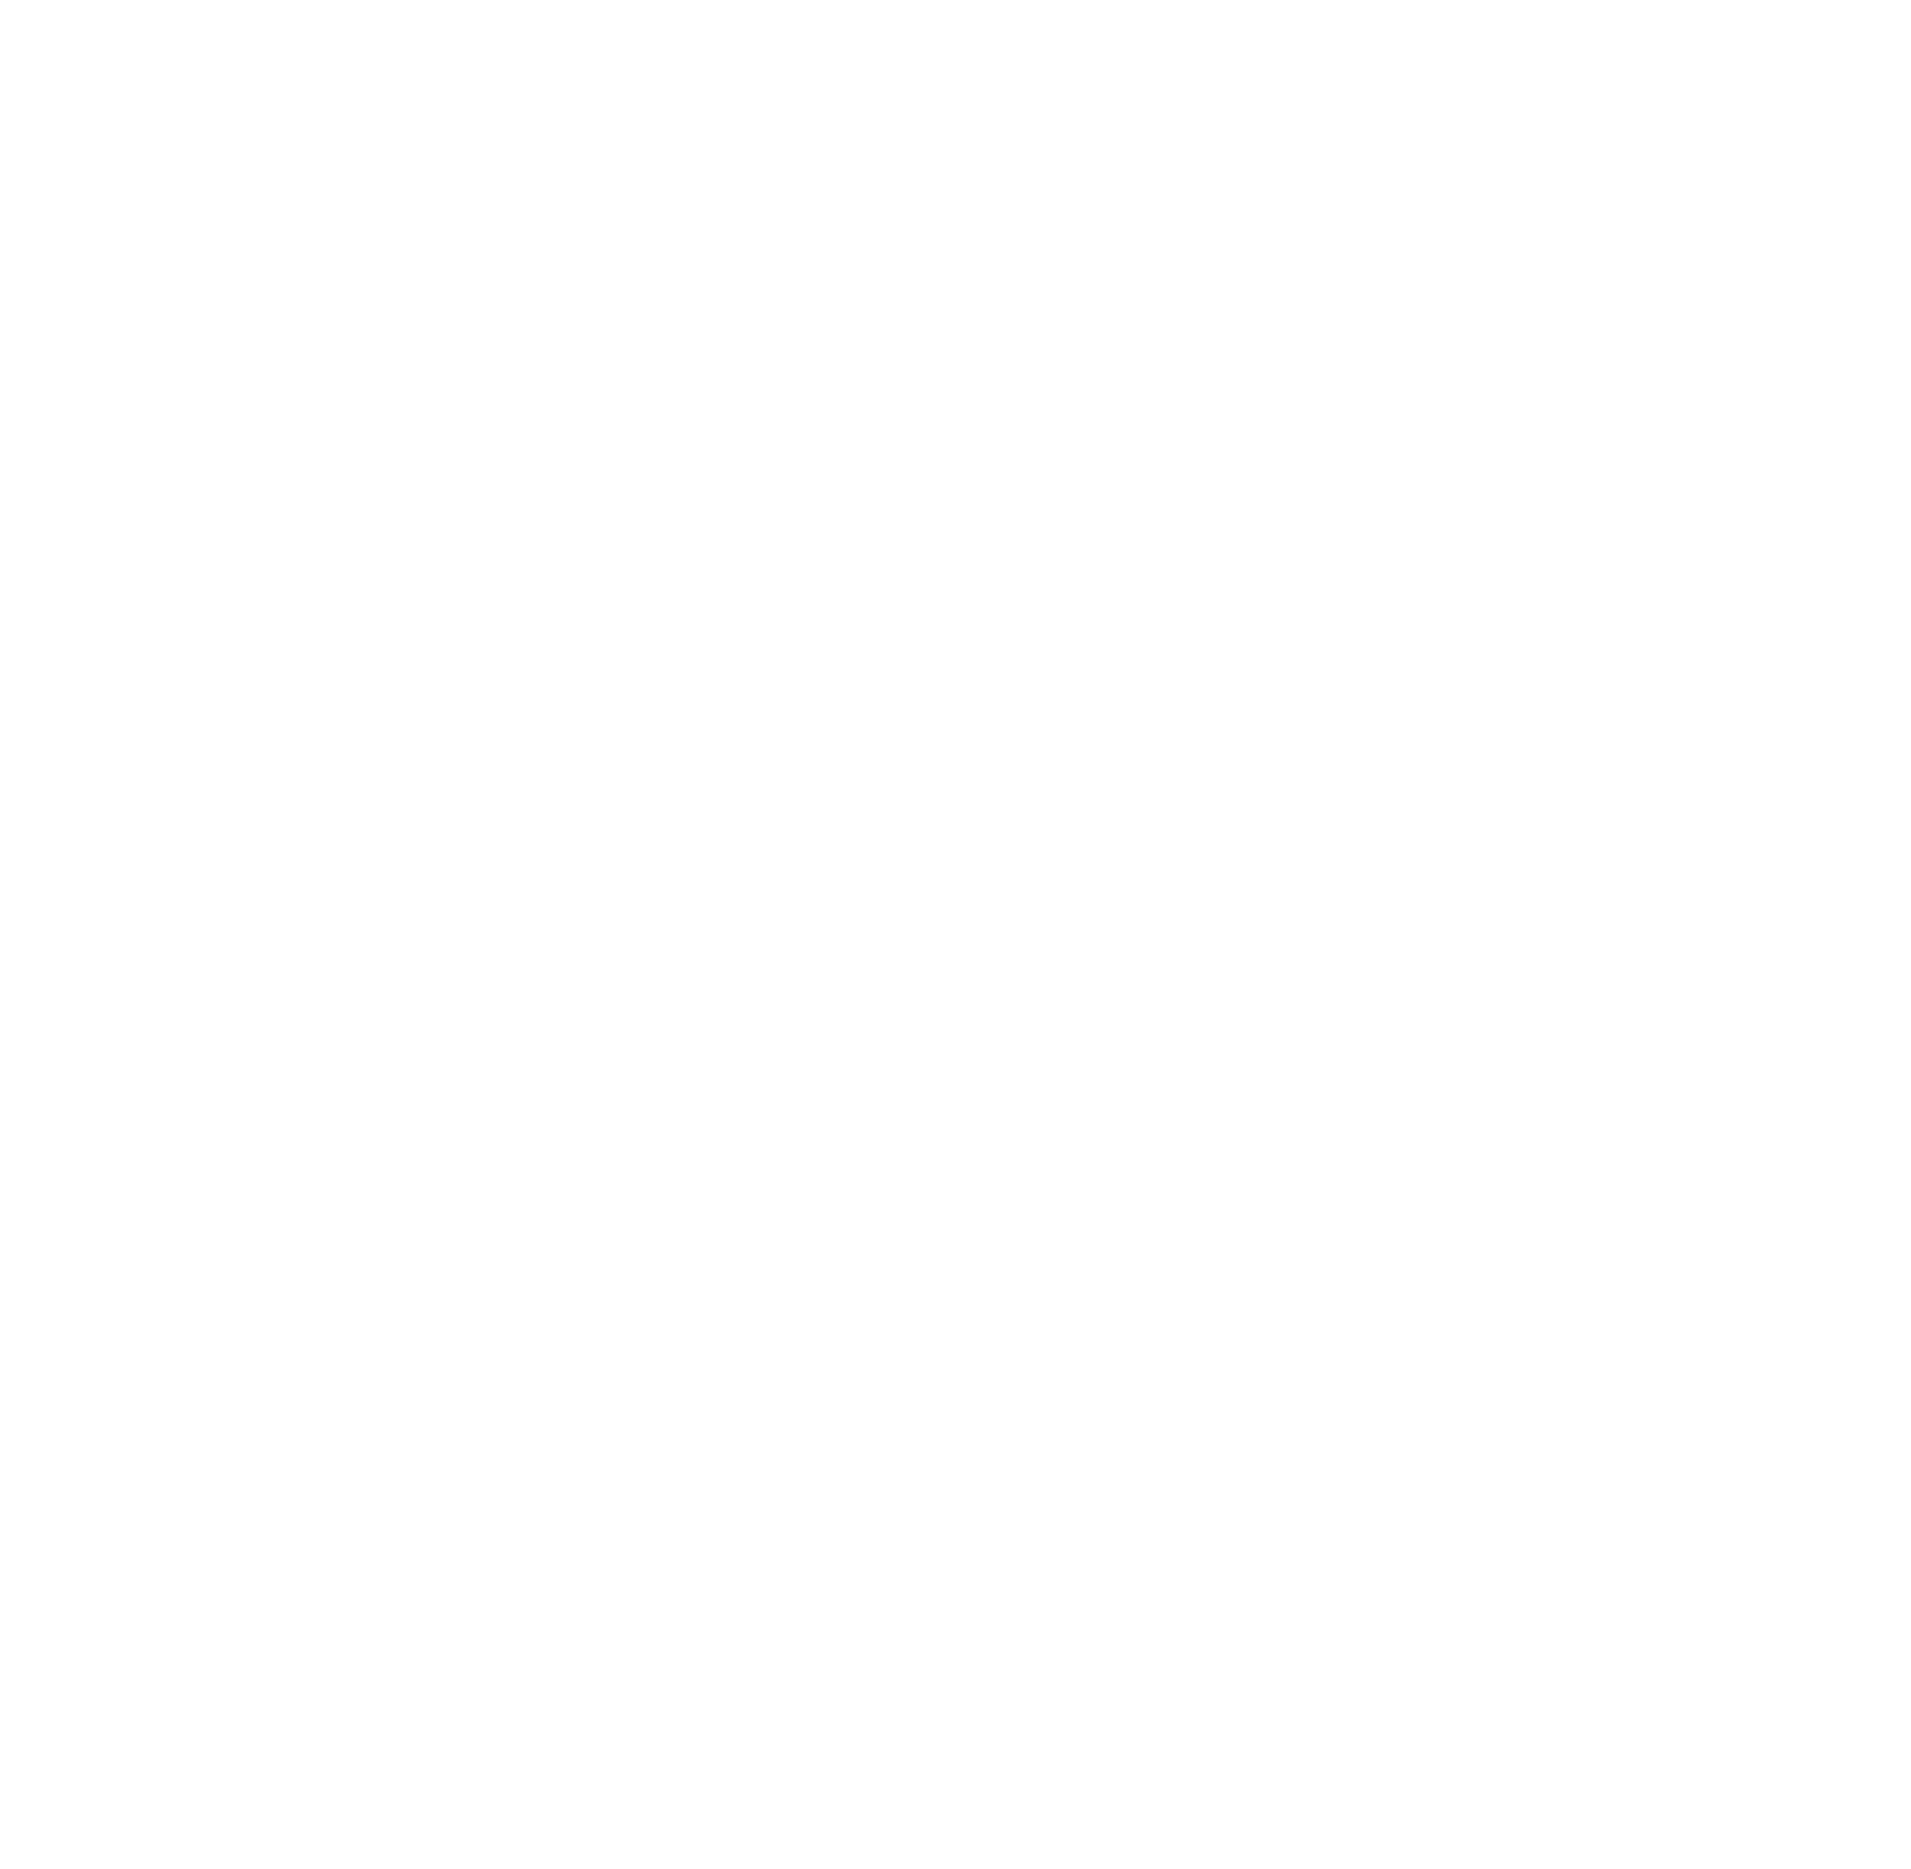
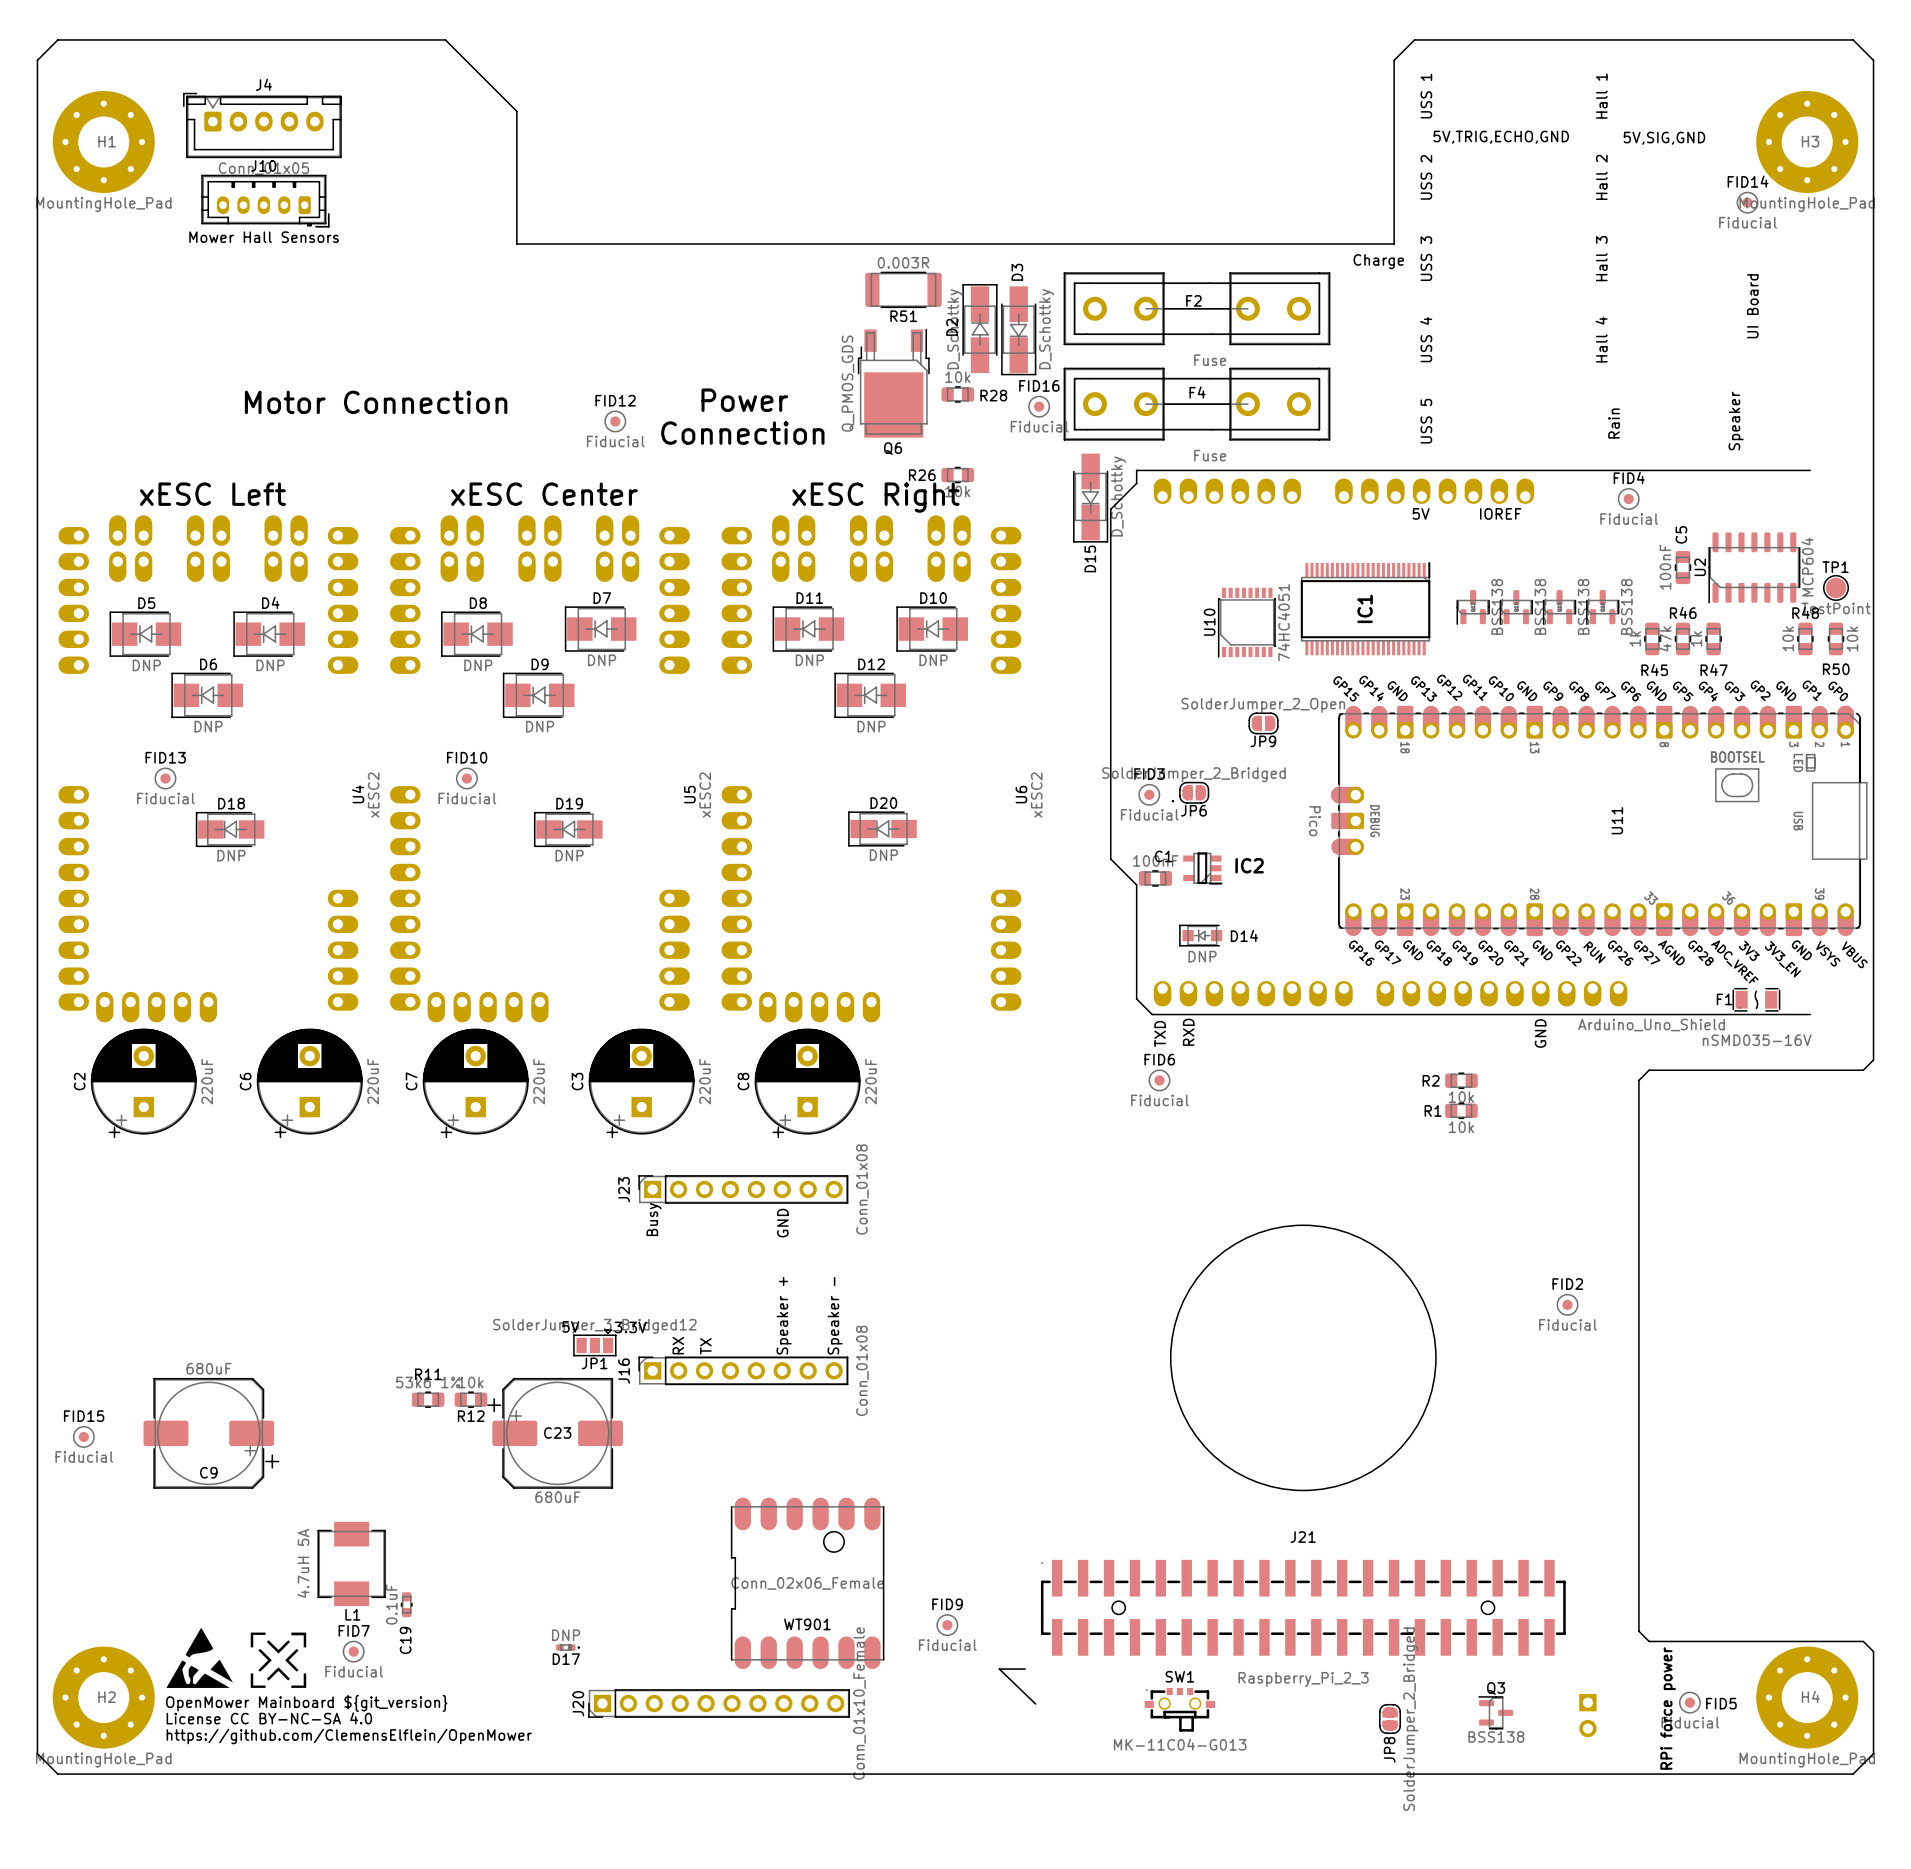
board edge: none -> (57, 39) (37, 60) (37, 1753) (57, 1774) (1853, 1774) (1873, 1753) (1873, 1651) (1863, 1641) (1649, 1641) (1638, 1631) (1638, 1080) (1649, 1070) (1863, 1070) (1873, 1060) (1873, 60) (1853, 39) (1414, 39) (1394, 60) (1394, 243) (516, 243) (516, 111) (445, 39) (57, 39)
text: none -> USS 1 (1426, 96)
text: none -> Hall 1 (1601, 96)
J4: none -> Conn_01x05 (262, 125)
text: none -> 5V,TRIG,ECHO,GND (1501, 137)
text: none -> 5V,SIG,GND (1664, 138)
H1: none -> MountingHole_Pad (103, 141)
H3: none -> MountingHole_Pad (1807, 141)
text: none -> USS 2 (1426, 177)
text: none -> Hall 2 (1601, 177)
J10: none -> (265, 201)
FID14: none -> Fiducial (1747, 202)
text: none -> Mower Hall Sensors (264, 237)
text: none -> USS 3 (1426, 258)
text: none -> Hall 3 (1601, 258)
text: none -> Charge (1378, 261)
R51: none -> 0.003R (903, 289)
text: none -> UI Board (1752, 306)
F2: none -> Fuse (1196, 308)
D2: none -> D_Schottky (979, 328)
D3: none -> D_Schottky (1018, 330)
text: none -> USS 4 (1426, 339)
text: none -> Hall 4 (1601, 339)
Q6: none -> Q_PMOS_GDS (893, 383)
R28: none -> 10k (957, 394)
text: none -> Power (744, 400)
text: none -> Motor Connection (376, 402)
F4: none -> Fuse (1196, 404)
FID16: none -> Fiducial (1039, 406)
text: none -> Speaker (1736, 420)
FID12: none -> Fiducial (615, 421)
text: none -> USS 5 (1426, 421)
text: none -> Rain (1614, 423)
text: none -> Connection (742, 433)
R26: none -> 10k (957, 475)
text: none -> xESC Left (212, 494)
text: none -> xESC Center (544, 494)
text: none -> xESC Right (875, 497)
D15: none -> D_Schottky (1090, 498)
FID4: none -> Fiducial (1628, 499)
text: none -> 5V (1421, 513)
text: none -> IOREF (1500, 513)
C5: none -> 100nF (1682, 567)
U2: none -> MCP604 (1754, 567)
TP1: none -> TestPoint (1836, 587)
part: none -> BSS138 (1473, 607)
part: none -> BSS138 (1516, 607)
part: none -> BSS138 (1559, 607)
part: none -> BSS138 (1602, 607)
IC1: none -> (1365, 608)
U10: none -> 74HC4051 (1246, 622)
D7: none -> DNP (600, 629)
D11: none -> DNP (808, 629)
D10: none -> DNP (932, 629)
D5: none -> DNP (145, 634)
D4: none -> DNP (269, 634)
D8: none -> DNP (476, 634)
R45: none -> 1k (1652, 638)
R46: none -> 47k (1682, 638)
R47: none -> 1k (1713, 638)
R48: none -> 10k (1805, 638)
R50: none -> 10k (1836, 638)
D6: none -> DNP (207, 695)
D9: none -> DNP (538, 695)
D12: none -> DNP (870, 695)
JP9: none -> SolderJumper_2_Open (1263, 723)
part: none -> Arduino_Uno_Shield (1460, 742)
U4: none -> xESC2 (208, 768)
U5: none -> xESC2 (539, 768)
U6: none -> xESC2 (871, 768)
FID13: none -> Fiducial (165, 778)
FID10: none -> Fiducial (466, 778)
JP6: none -> SolderJumper_2_Bridged (1194, 792)
FID3: none -> Fiducial (1149, 794)
U11: none -> Pico (1599, 820)
D20: none -> DNP (882, 828)
D18: none -> DNP (230, 829)
D19: none -> DNP (568, 829)
IC2: none -> (1202, 868)
C1: none -> 100nF (1155, 878)
D14: none -> DNP (1200, 935)
F1: none -> nSMD035-16V (1756, 999)
text: none -> RXD (1188, 1032)
text: none -> TXD (1160, 1033)
text: none -> GND (1540, 1033)
FID6: none -> Fiducial (1159, 1080)
R2: none -> 10k (1461, 1080)
C2: none -> 220uF (143, 1083)
C6: none -> 220uF (309, 1083)
C7: none -> 220uF (475, 1083)
C3: none -> 220uF (641, 1083)
C8: none -> 220uF (807, 1083)
R1: none -> 10k (1461, 1110)
J23: none -> Conn_01x08 (743, 1189)
text: none -> Busy (654, 1219)
text: none -> GND (782, 1223)
round board edge: none -> [1170, 1224, 1437, 1492]
FID2: none -> Fiducial (1567, 1304)
text: none -> Speaker + (784, 1315)
text: none -> Speaker - (835, 1315)
text: none -> 5V (570, 1326)
text: none -> 3.3V (630, 1327)
JP1: none -> SolderJumper_3_Bridged12 (594, 1342)
text: none -> RX (678, 1345)
text: none -> TX (705, 1346)
J16: none -> Conn_01x08 (743, 1370)
R11: none -> 53k6 1% (428, 1399)
R12: none -> 10k (470, 1399)
C9: none -> 680uF (211, 1433)
C23: none -> 680uF (555, 1433)
FID15: none -> Fiducial (83, 1436)
L1: none -> 4.7uH 5A (351, 1563)
WT901: none -> Conn_02x06_Female (807, 1583)
C19: none -> 0.1uF (406, 1604)
J21: none -> Raspberry_Pi_2_3 (1303, 1607)
FID9: none -> Fiducial (947, 1625)
drawing: none -> [166, 1627, 233, 1689]
drawing: none -> [250, 1632, 307, 1688]
D17: none -> DNP (567, 1647)
FID7: none -> Fiducial (353, 1651)
line: none -> (1025, 1669) (999, 1669) (1035, 1704)
H2: none -> MountingHole_Pad (103, 1697)
H4: none -> MountingHole_Pad (1807, 1697)
FID5: none -> Fiducial (1689, 1702)
text: none -> OpenMower Mainboard ${git_version} (306, 1703)
J20: none -> Conn_01x10_Female (719, 1703)
text: none -> RPi force power (1668, 1708)
SW1: none -> MK-11C04-G013 (1179, 1709)
Q3: none -> BSS138 (1495, 1712)
part: none -> (1587, 1715)
text: none -> License CC BY-NC-SA 4.0 (269, 1718)
JP8: none -> SolderJumper_2_Bridged (1390, 1718)
text: none -> https://github.com/ClemensElflein/OpenMower (349, 1736)

